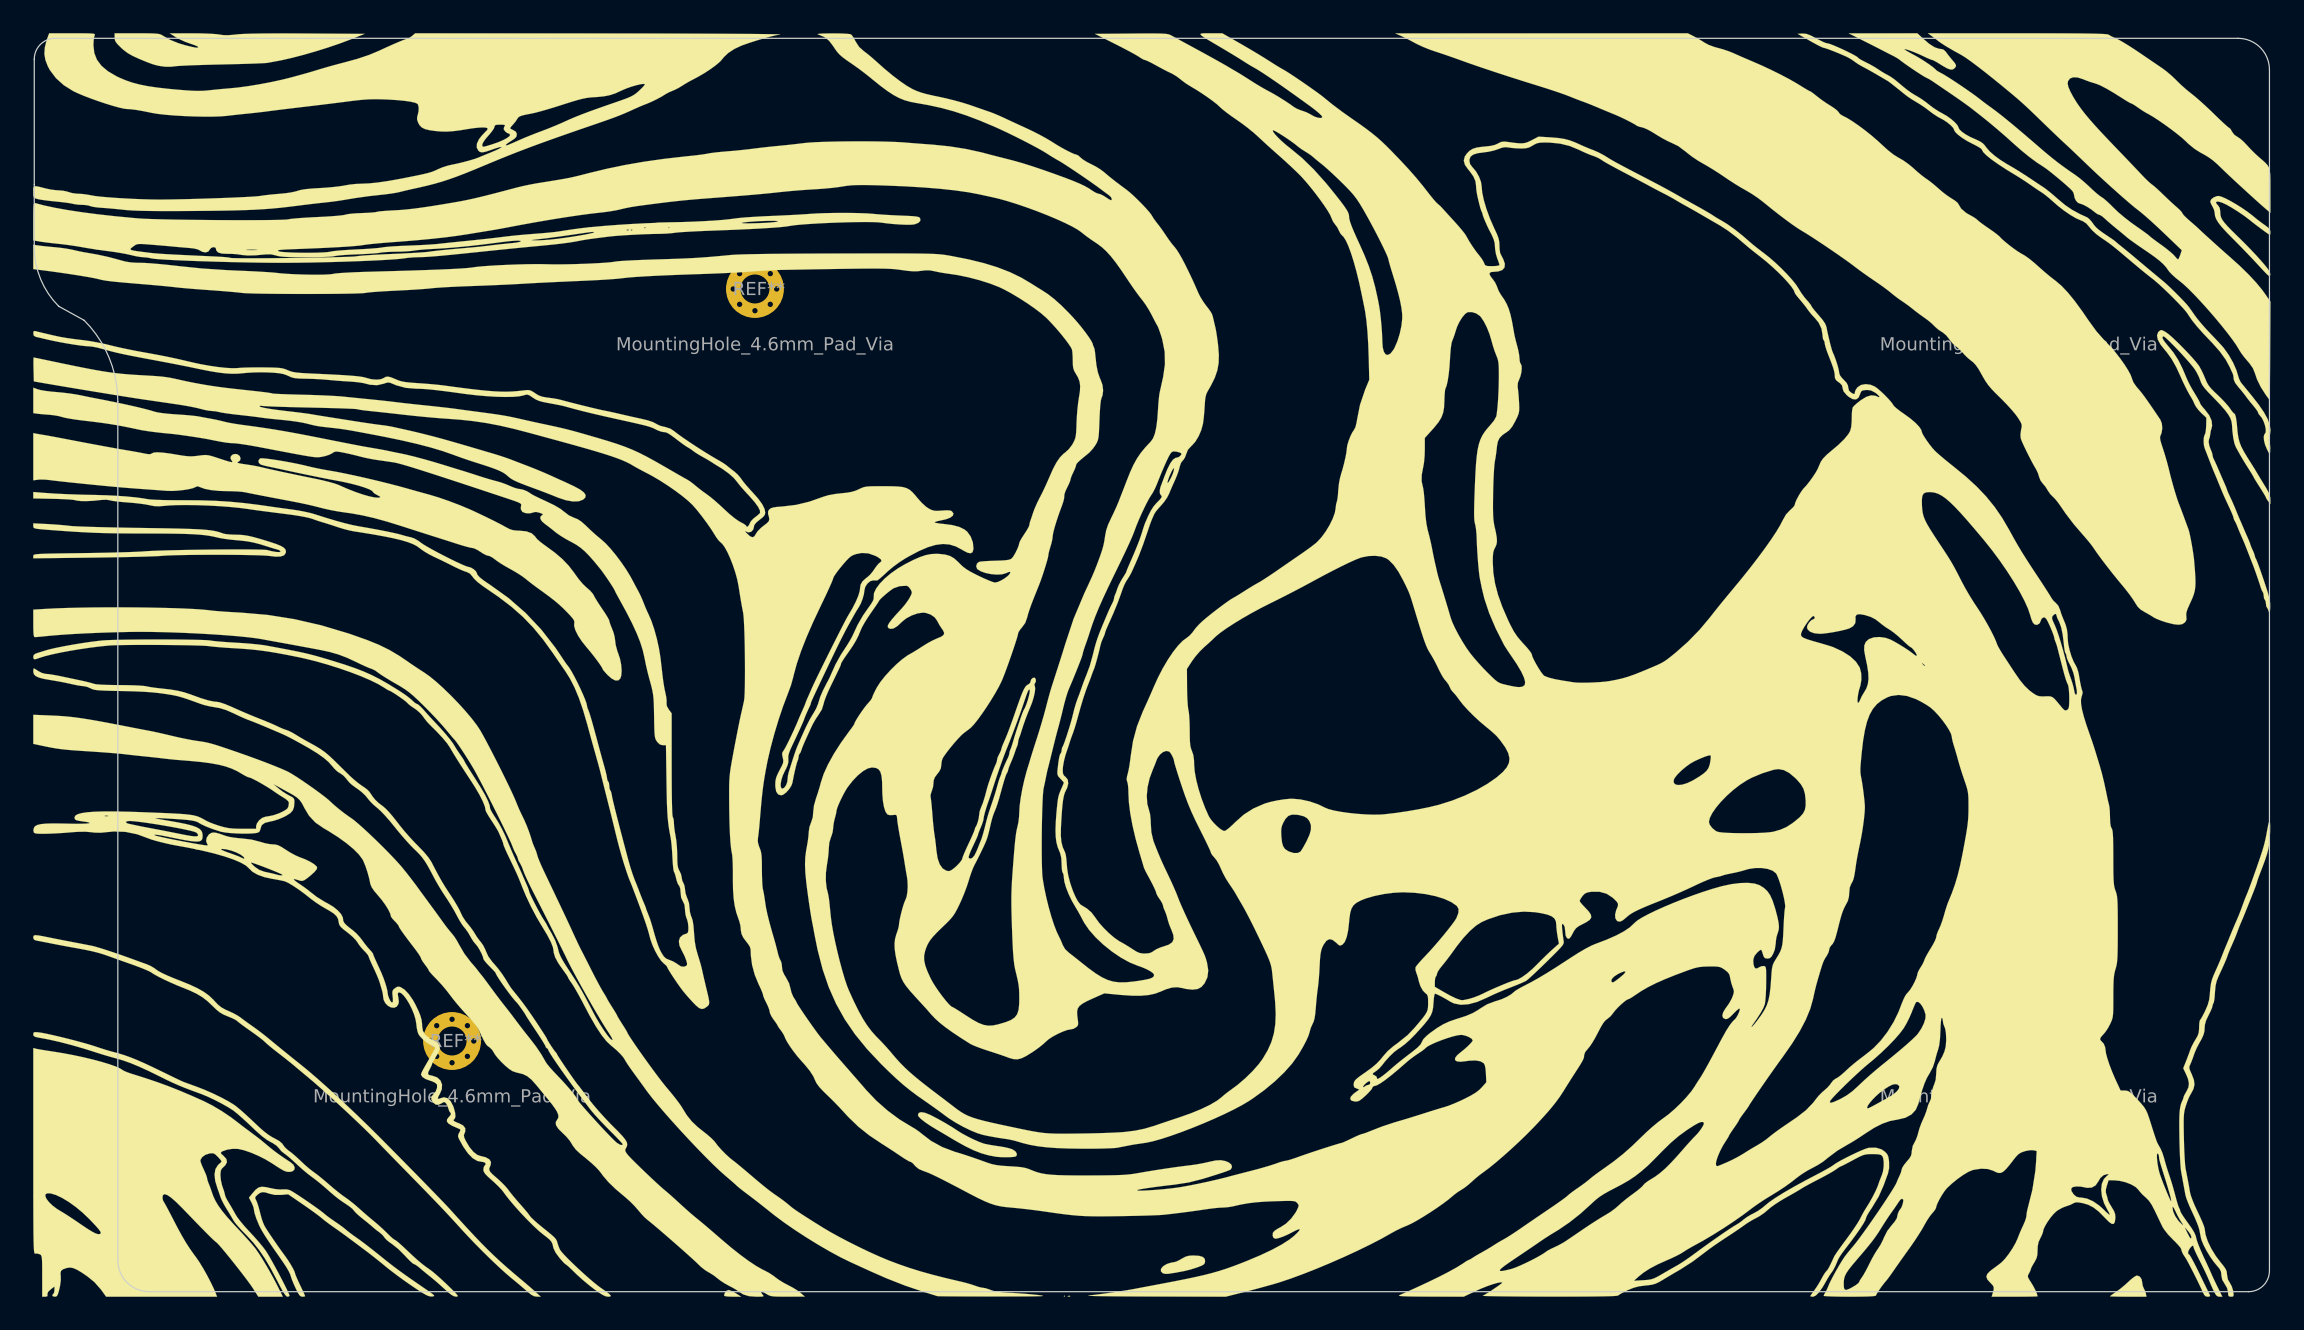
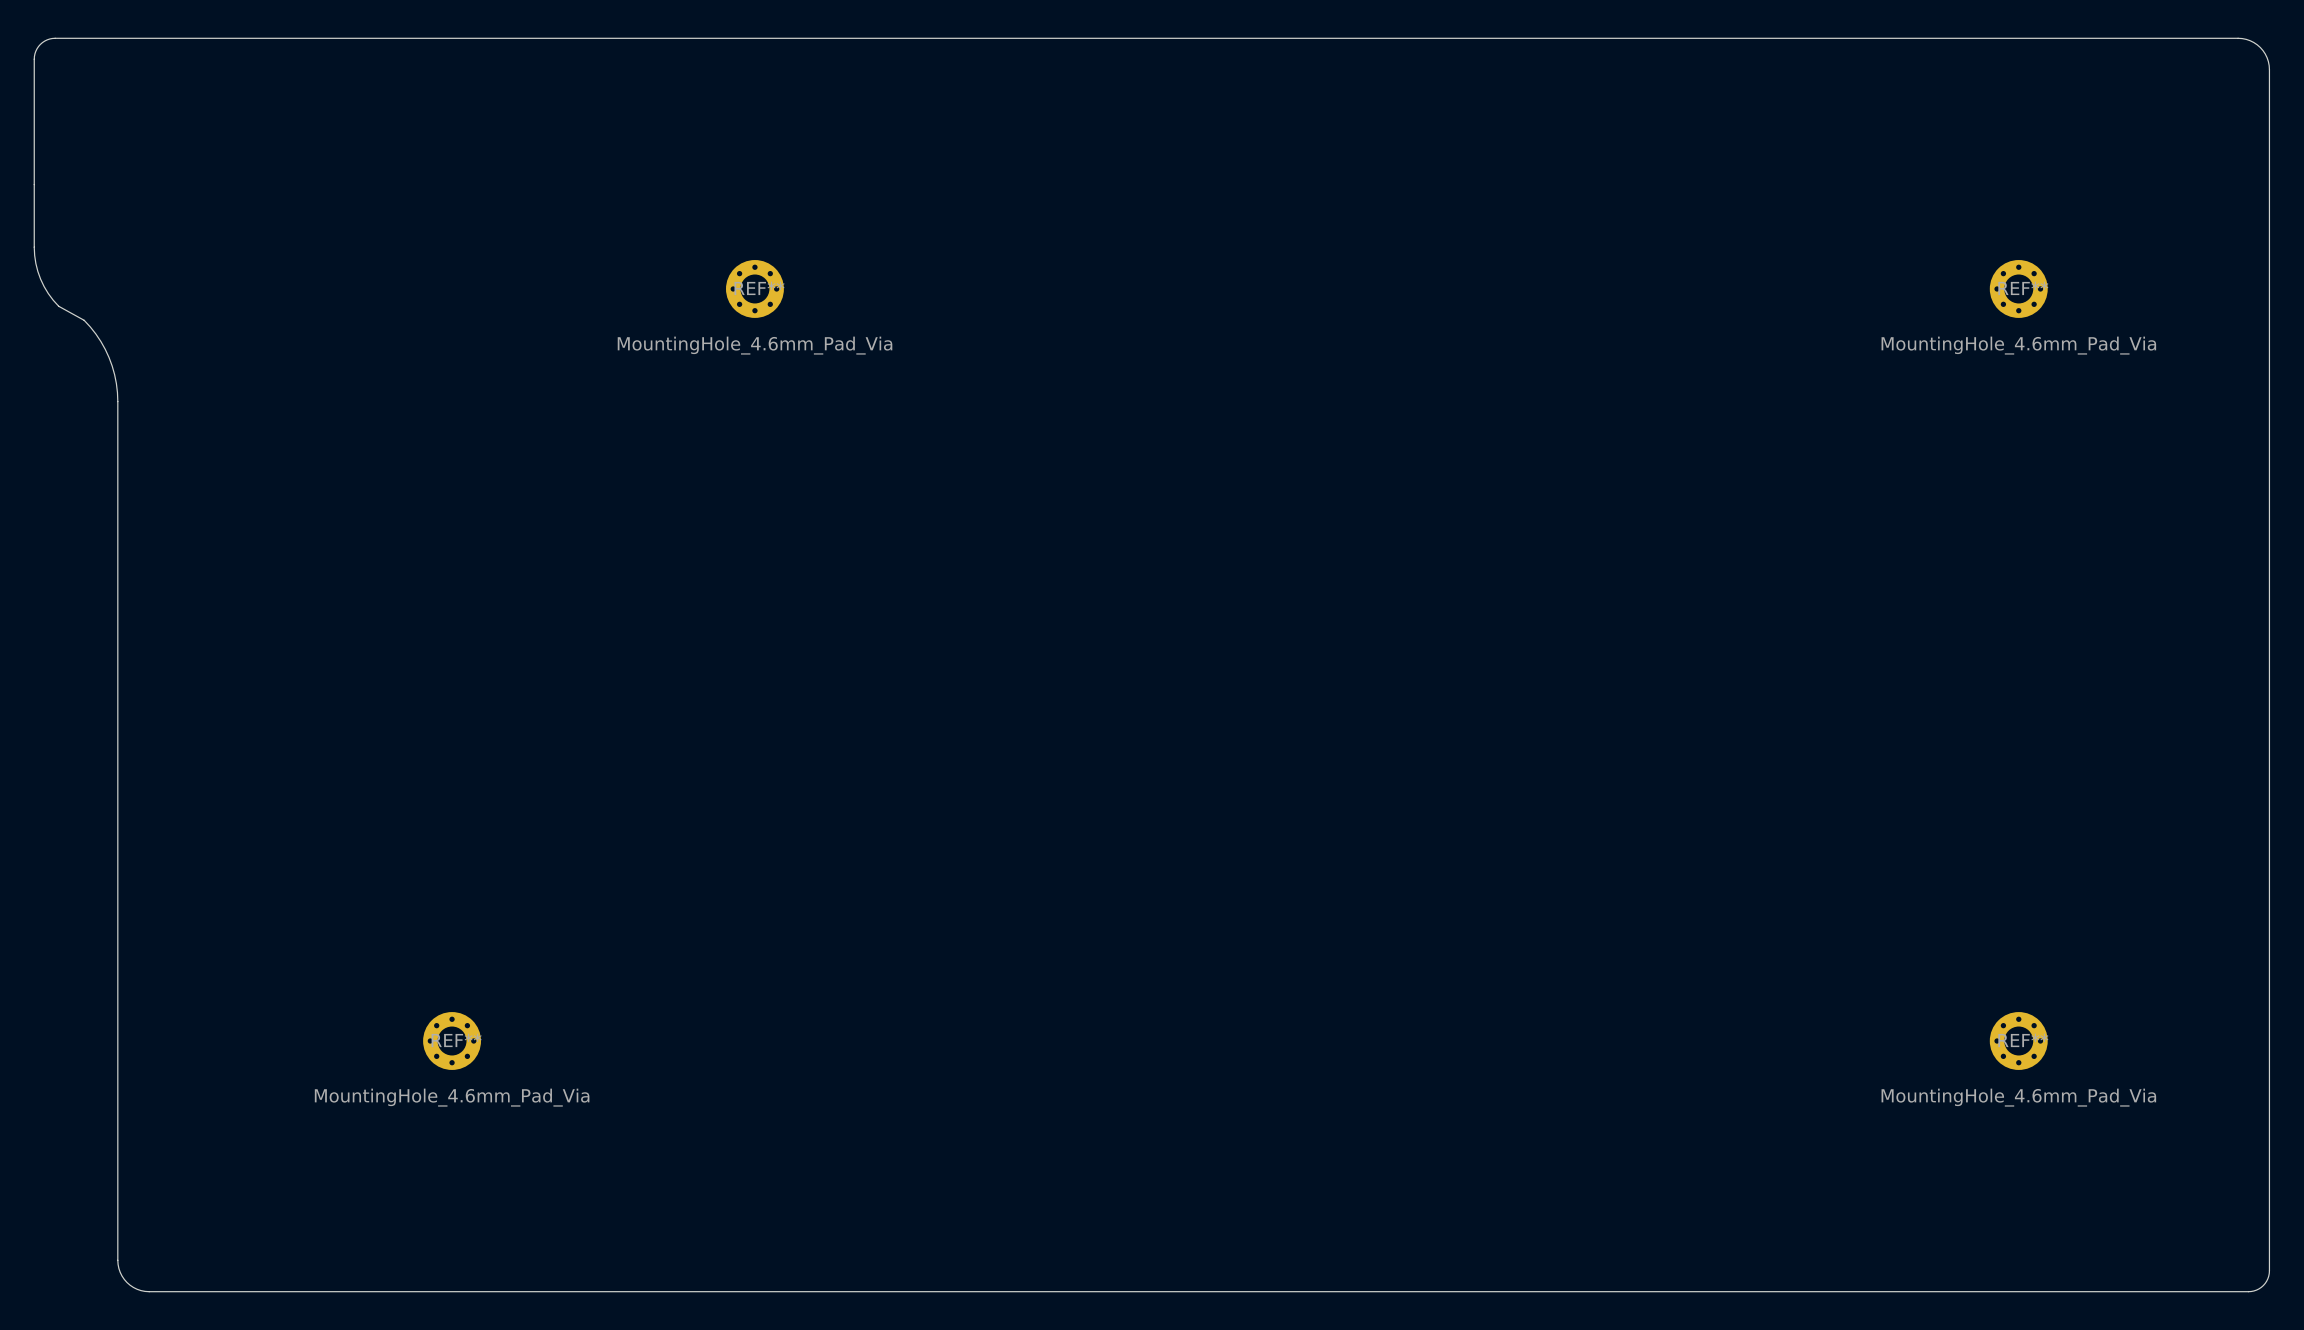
drawing: [33, 33, 2271, 1297] -> none

